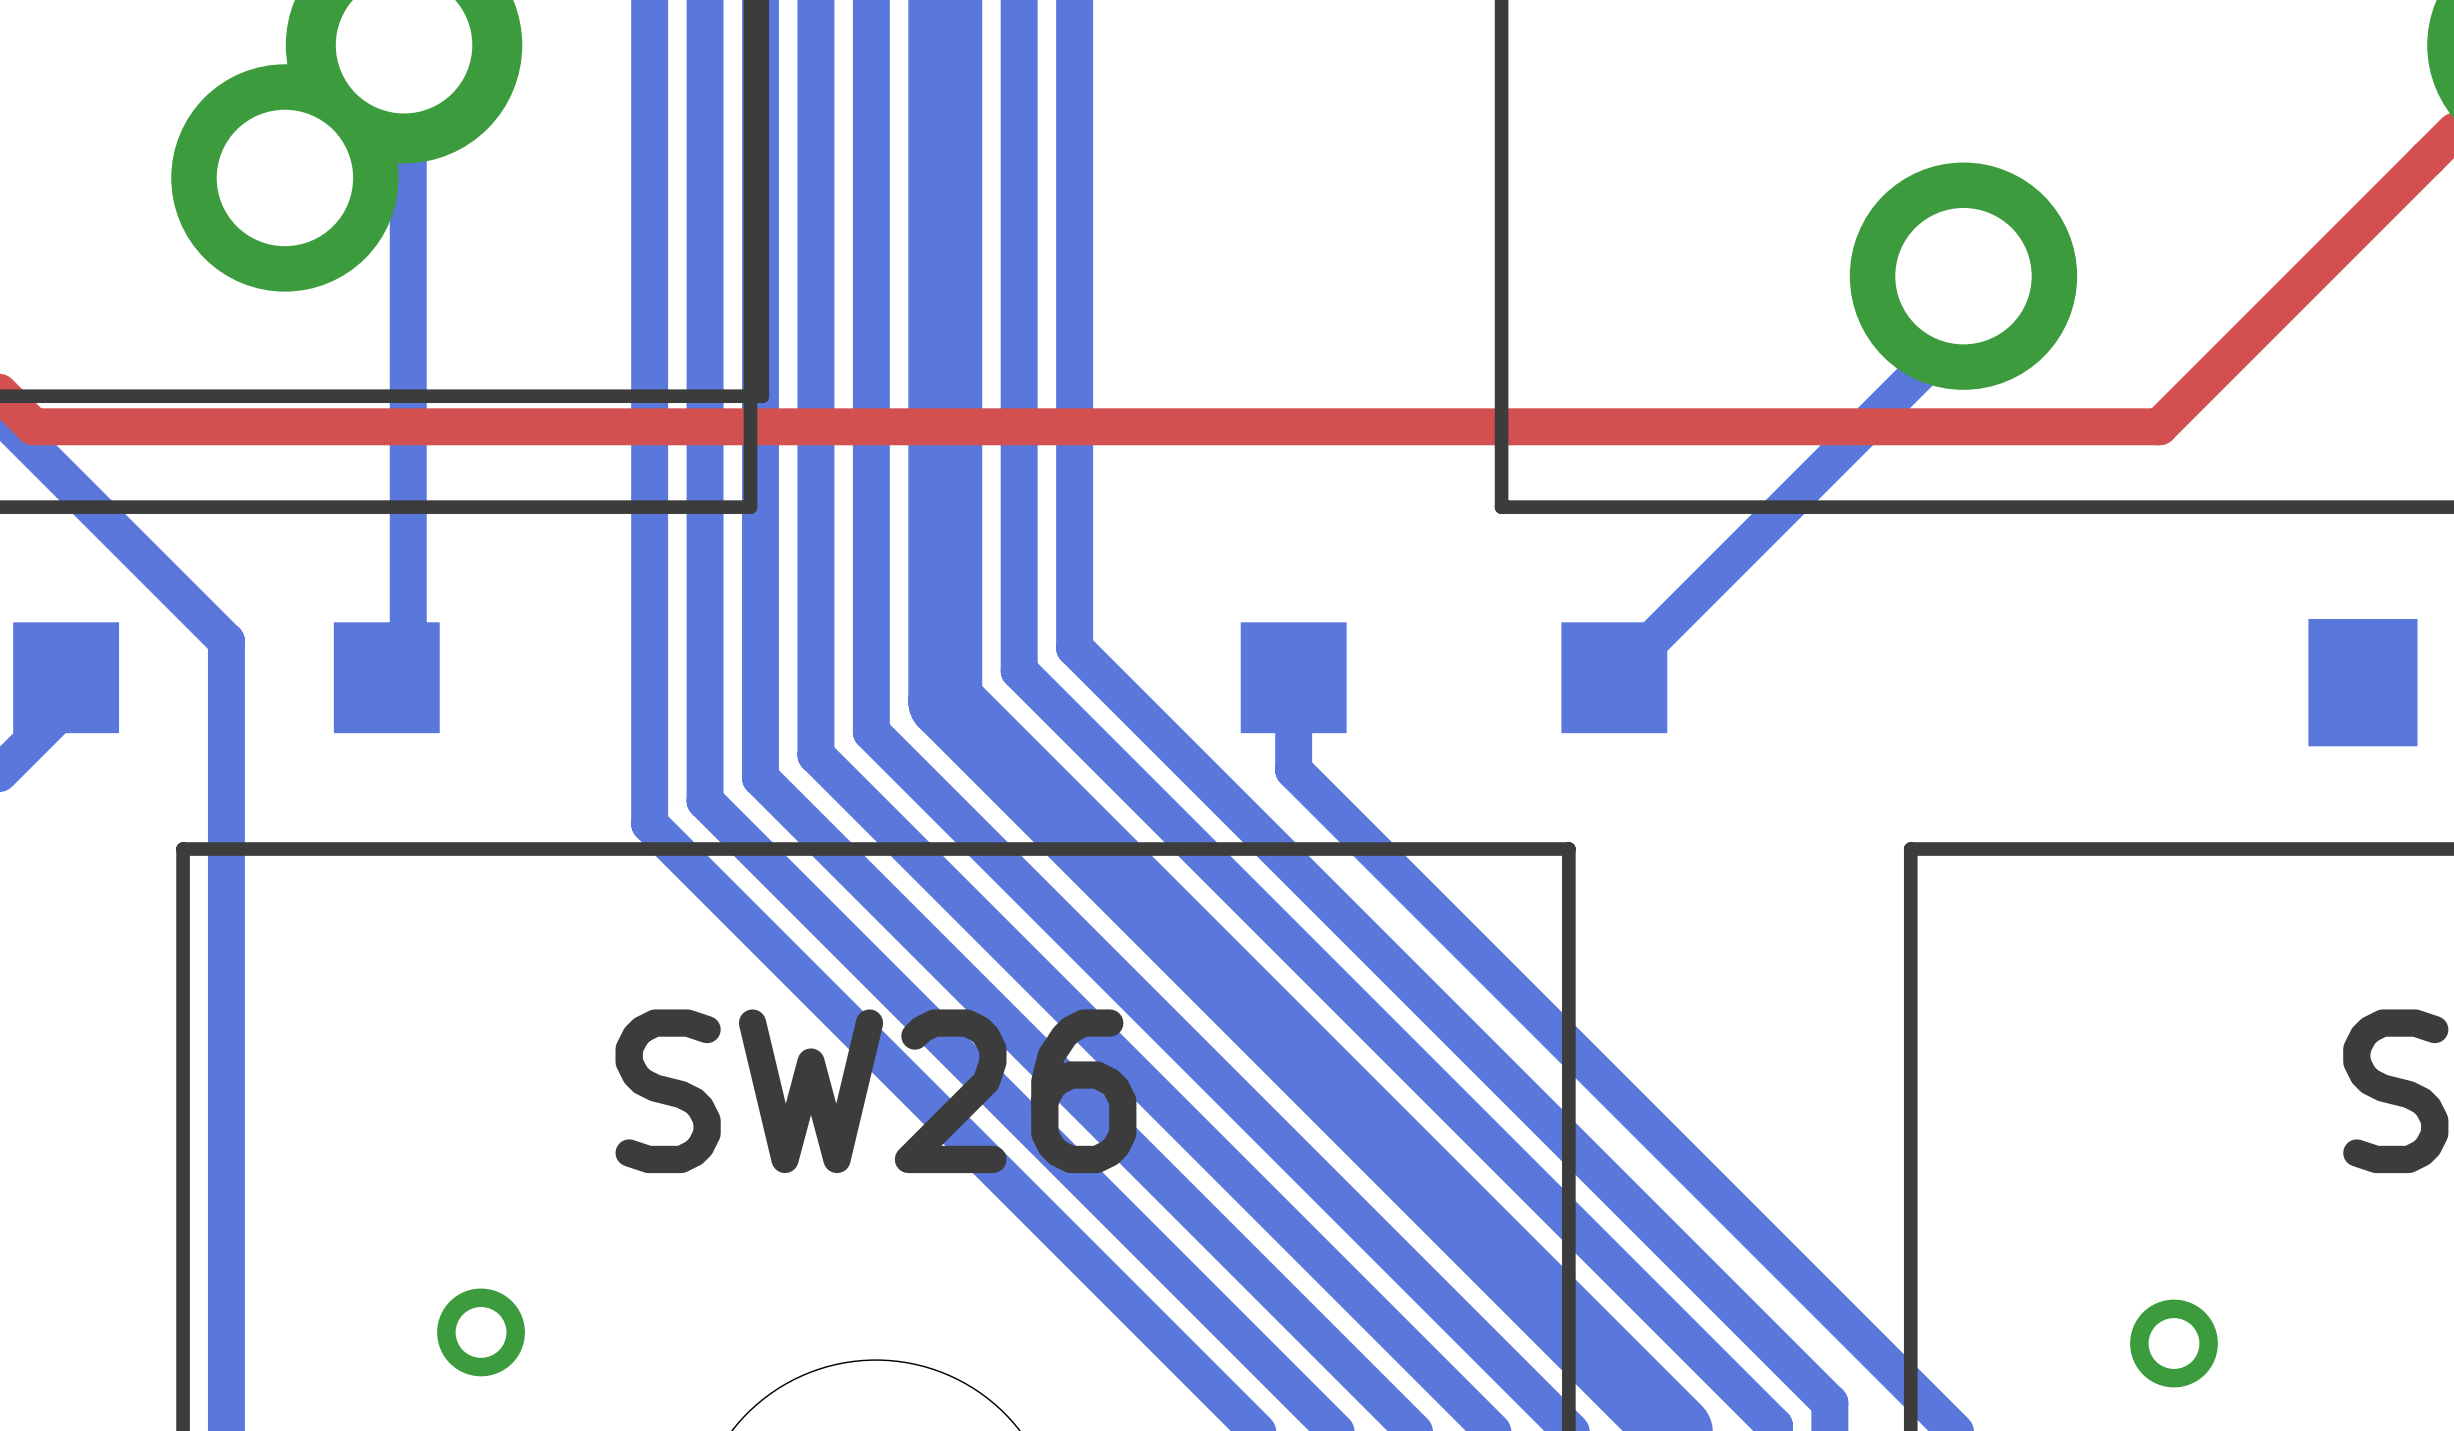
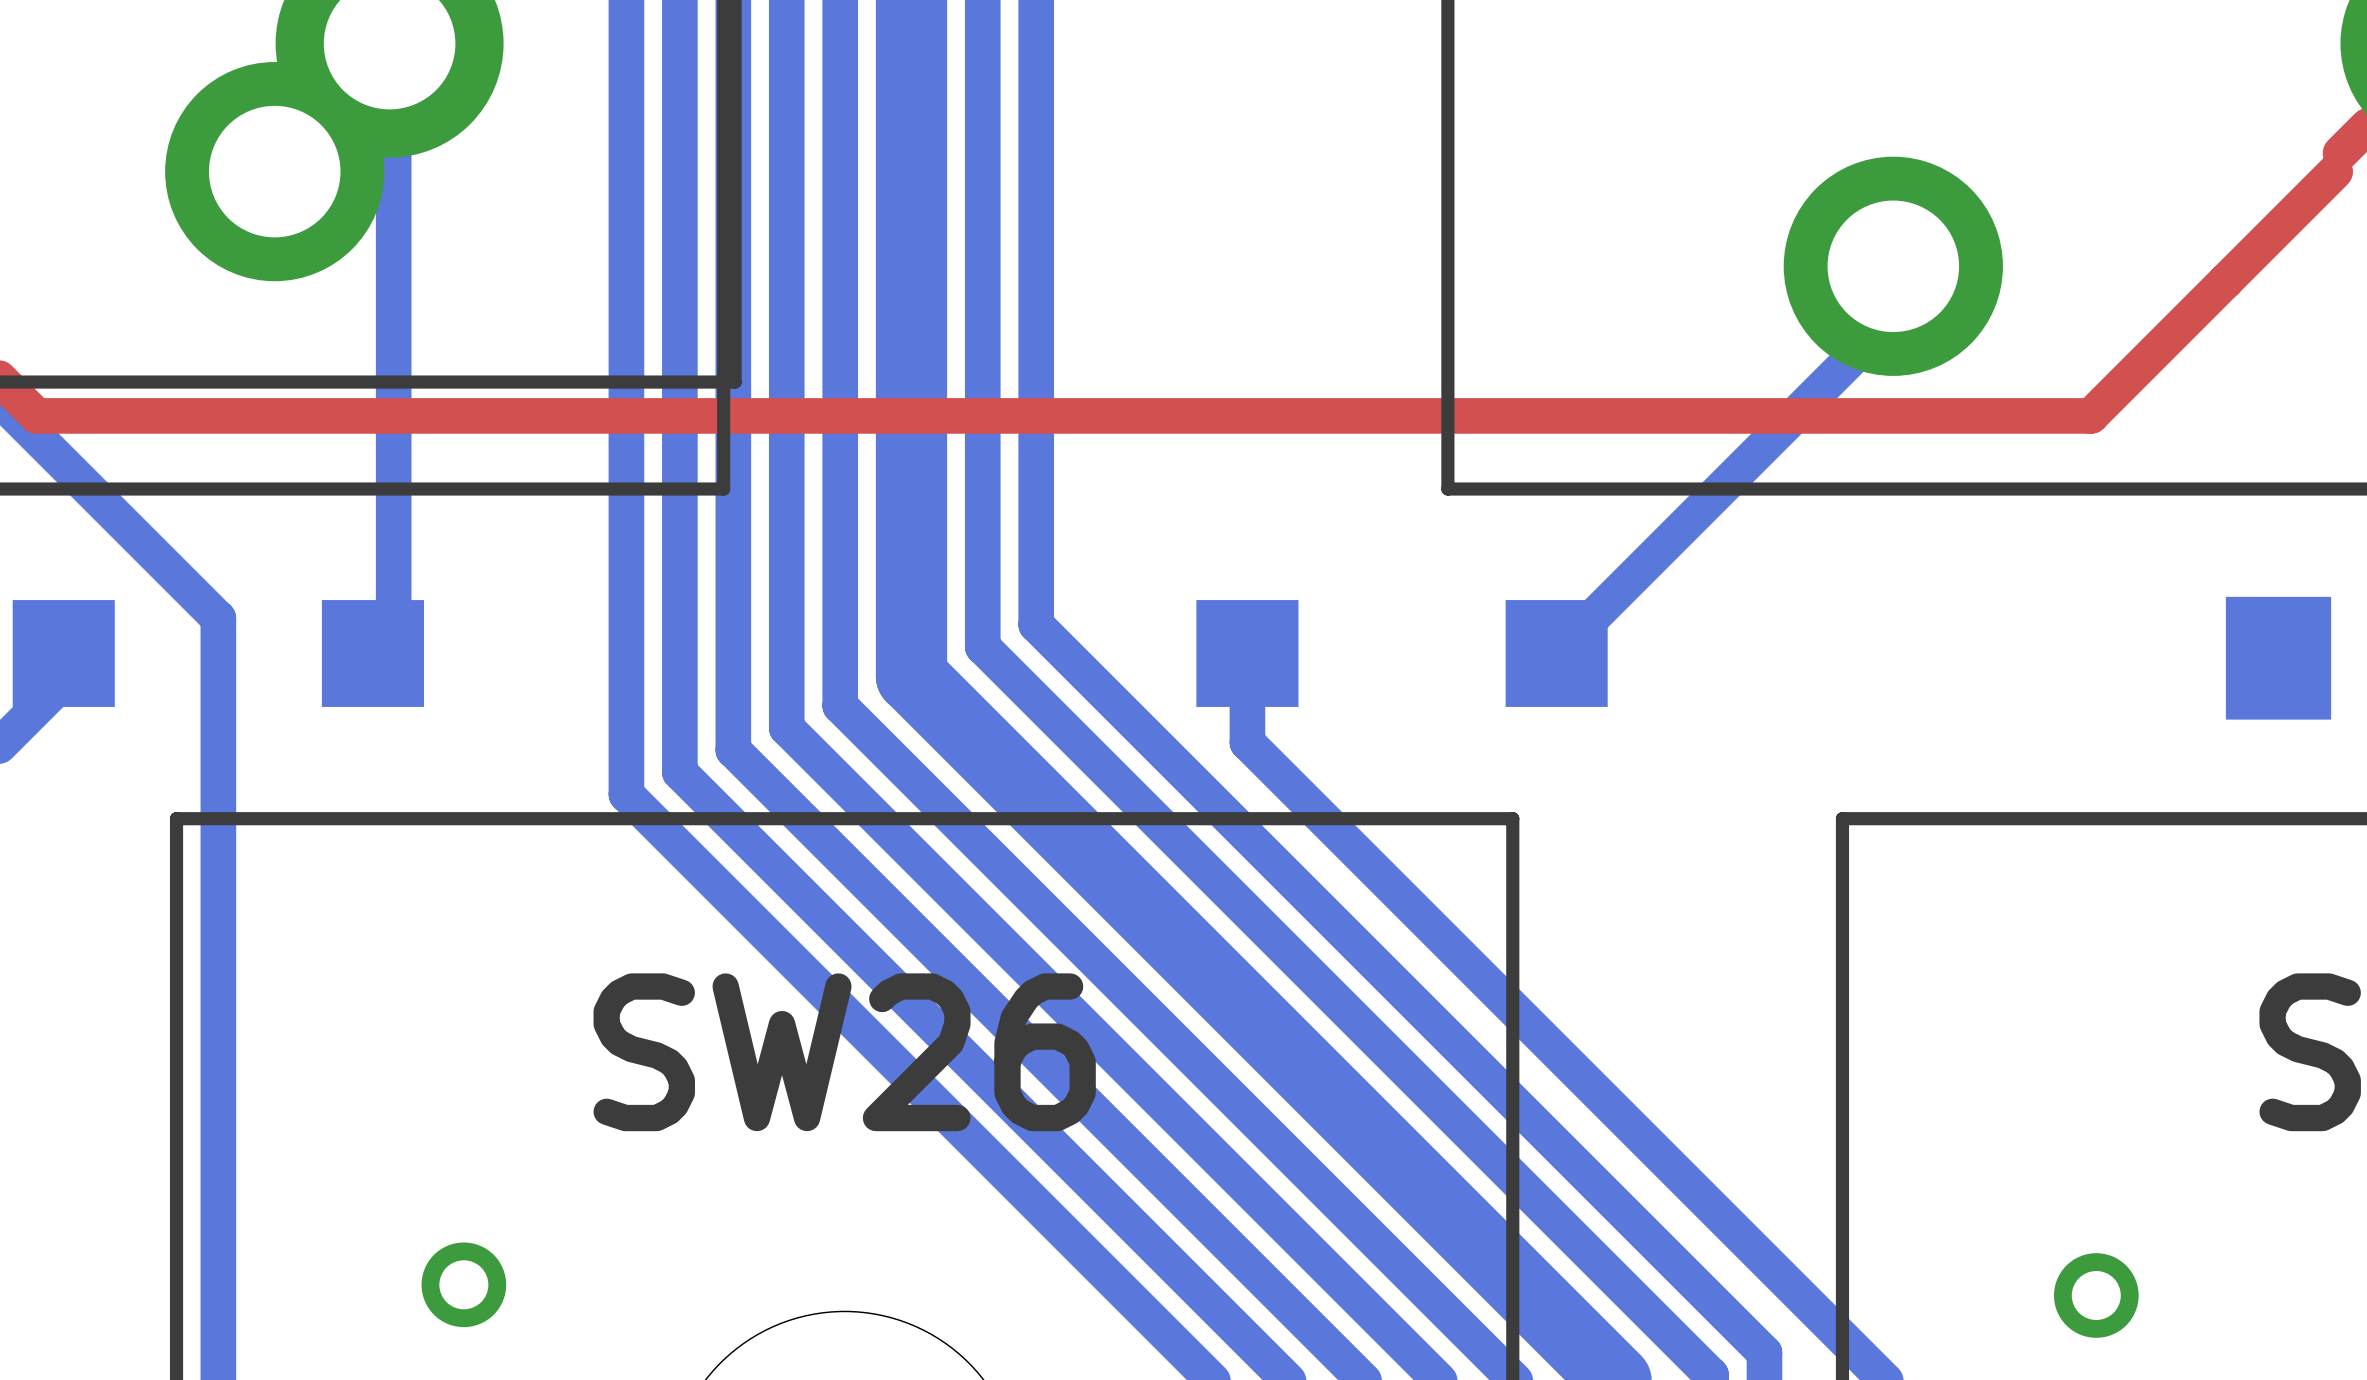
top track: (2427, 158) (2159, 426) (33, 426) -> (2335, 171) (2090, 415) (36, 415) (32, 411)

